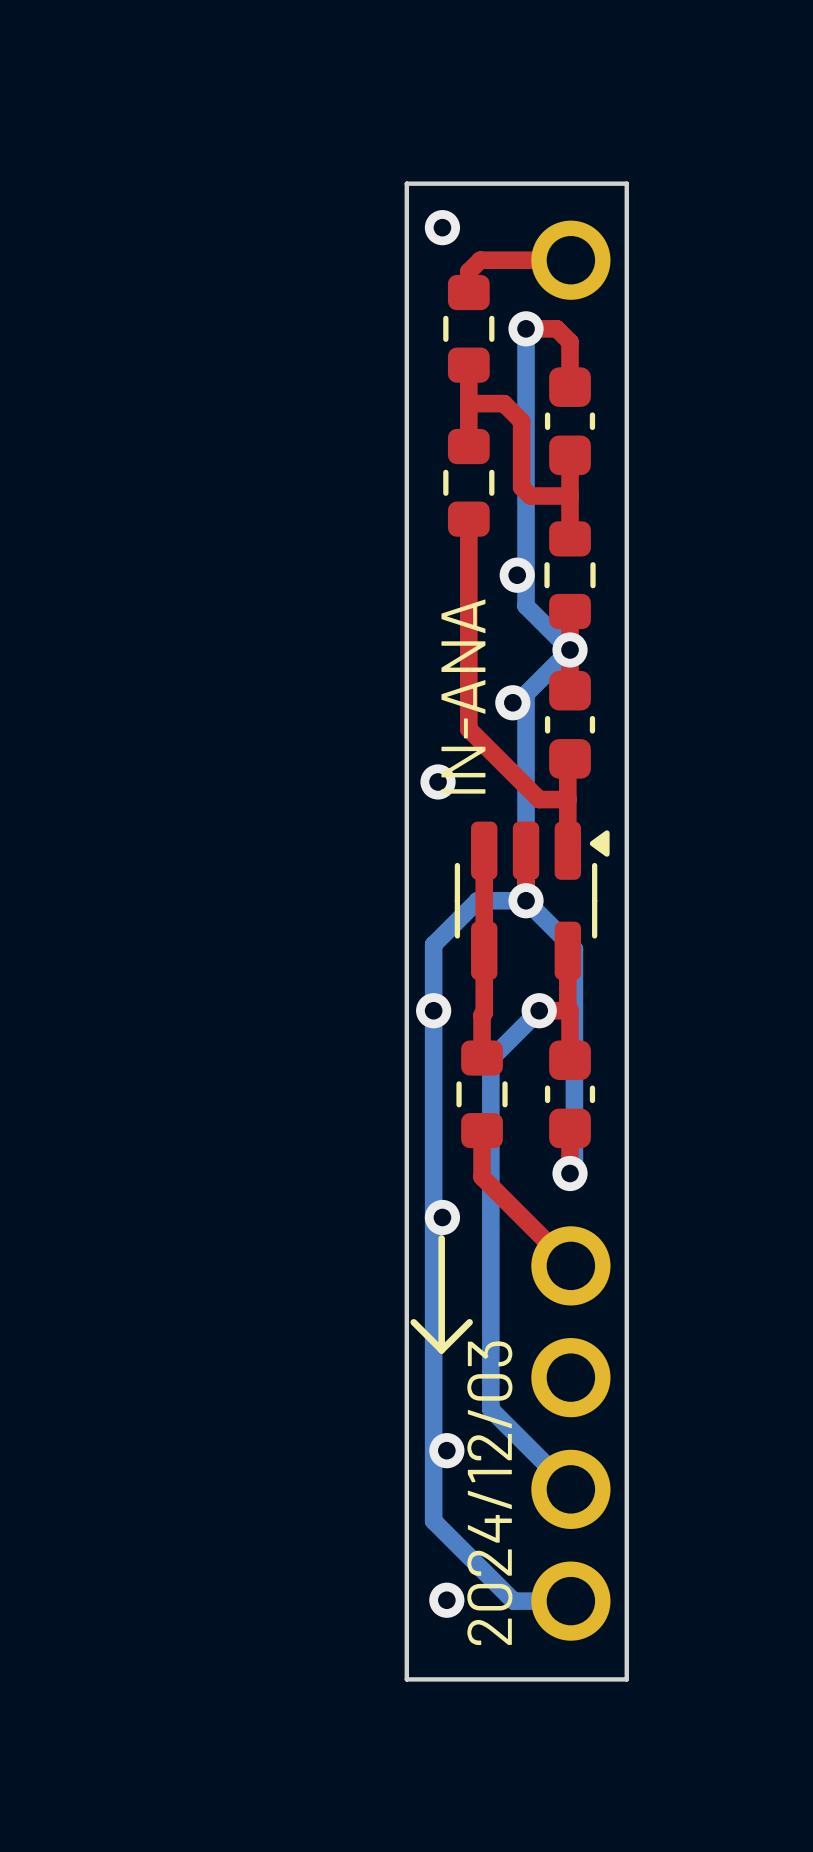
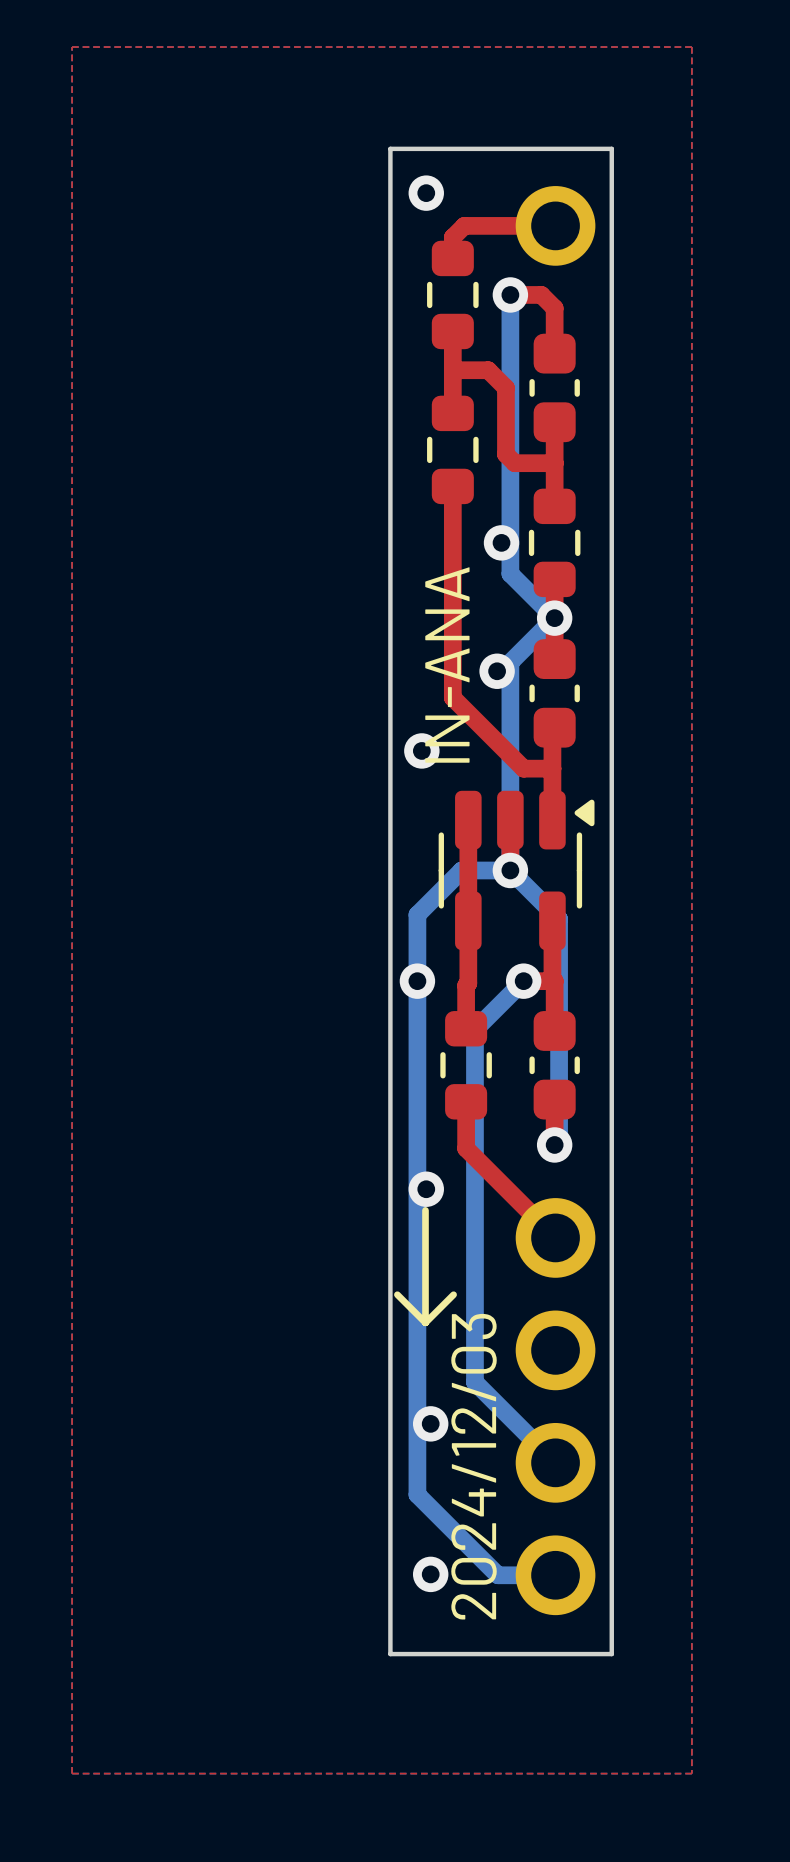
top zone outline: none -> (72, 47) (72, 1773) (691, 1773) (691, 47) (72, 47)

